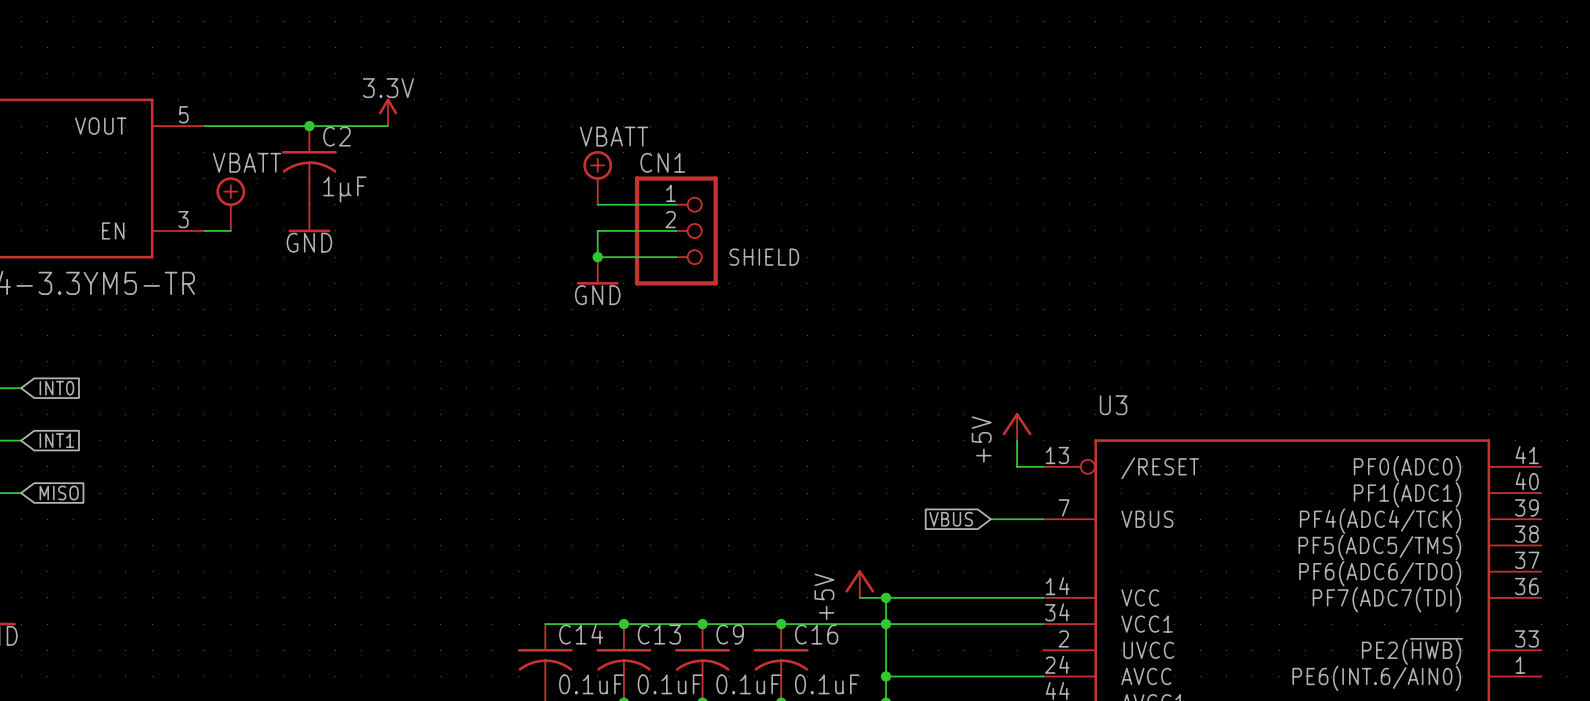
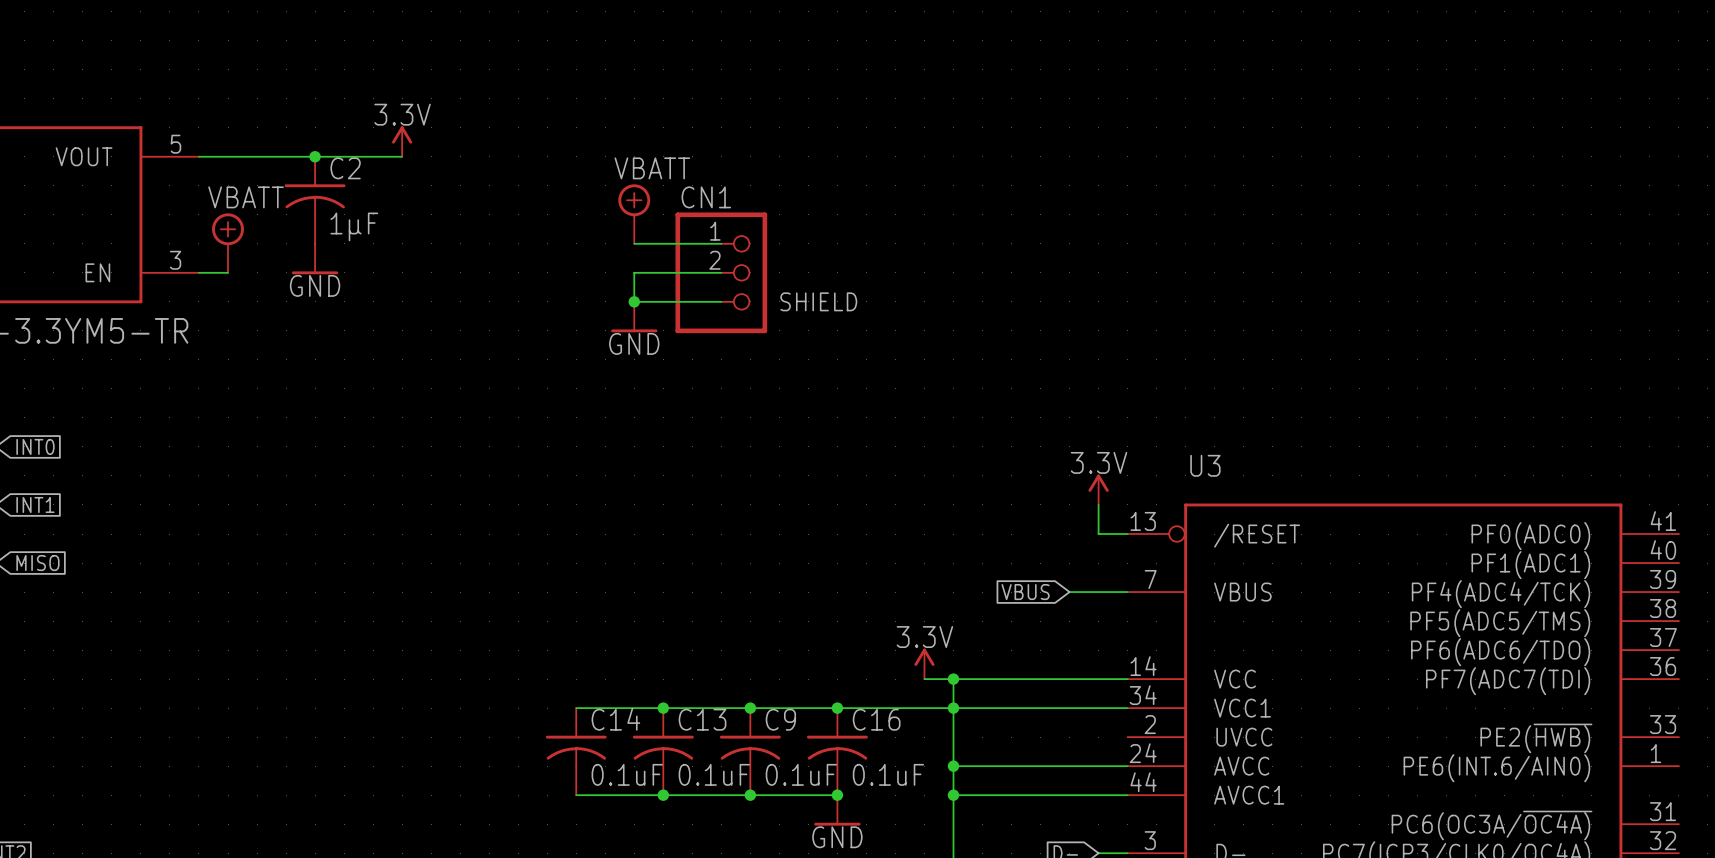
power symbol: +5V (1017, 426) -> 3.3V (1098, 489)
power symbol: +5V (859, 584) -> 3.3V (924, 663)

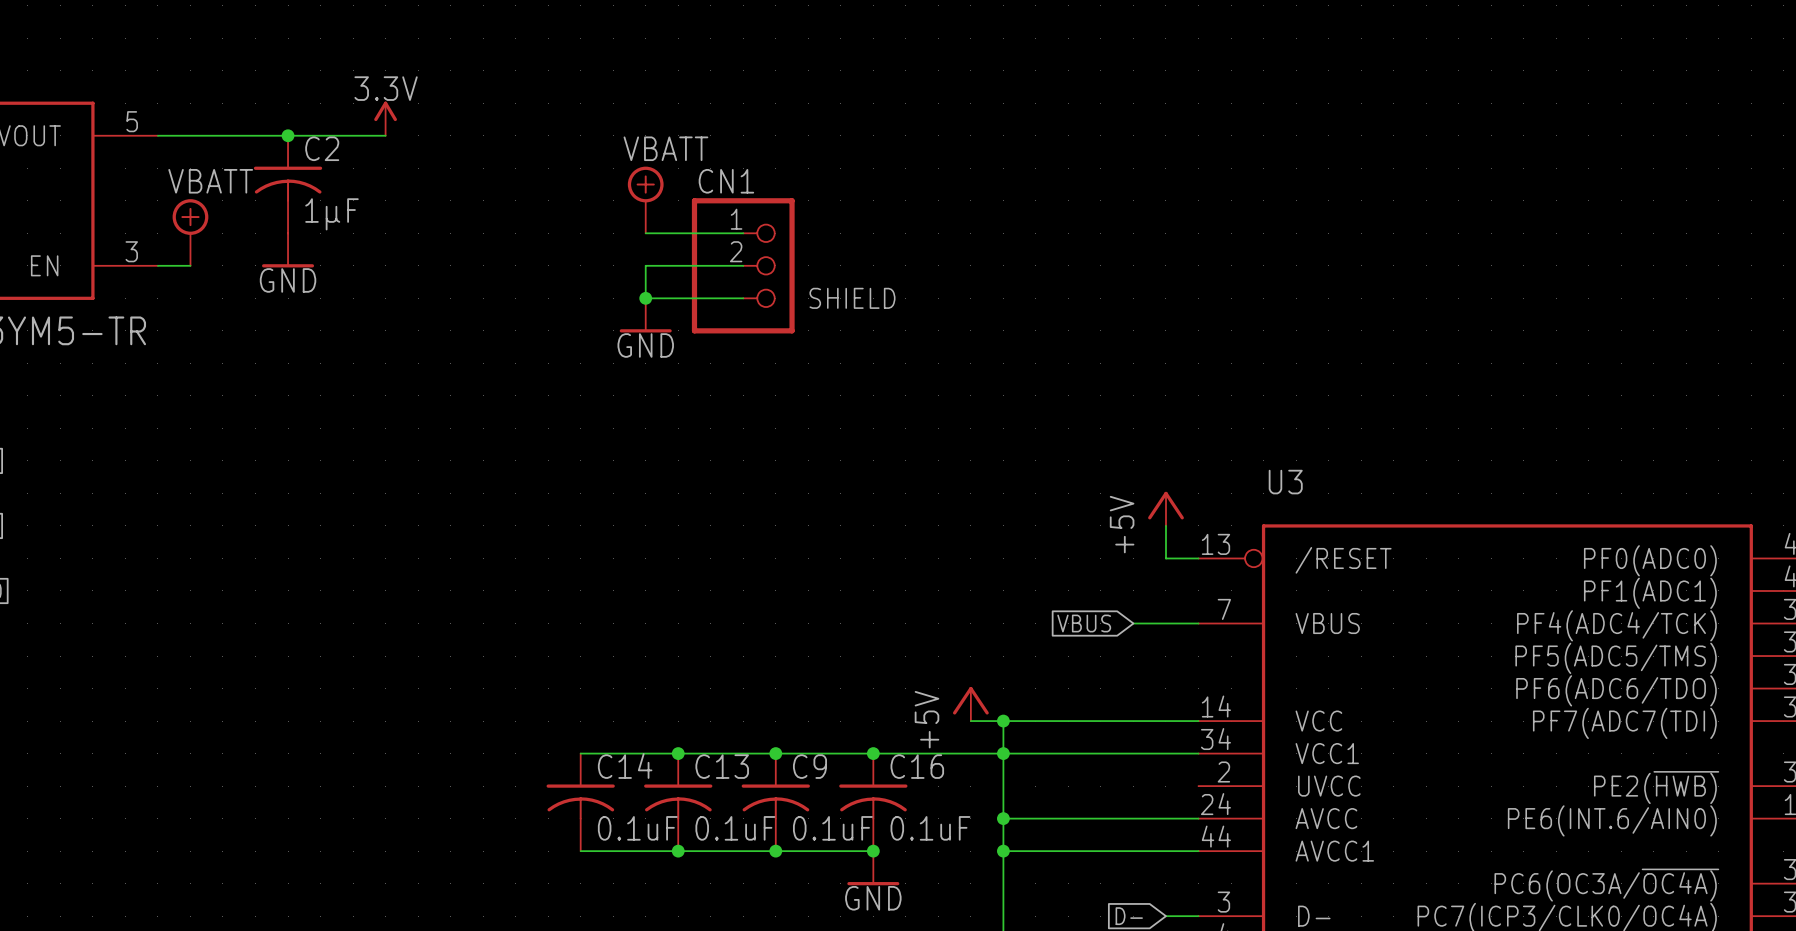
power symbol: 3.3V (1098, 489) -> +5V (1165, 508)
power symbol: 3.3V (924, 663) -> +5V (970, 703)

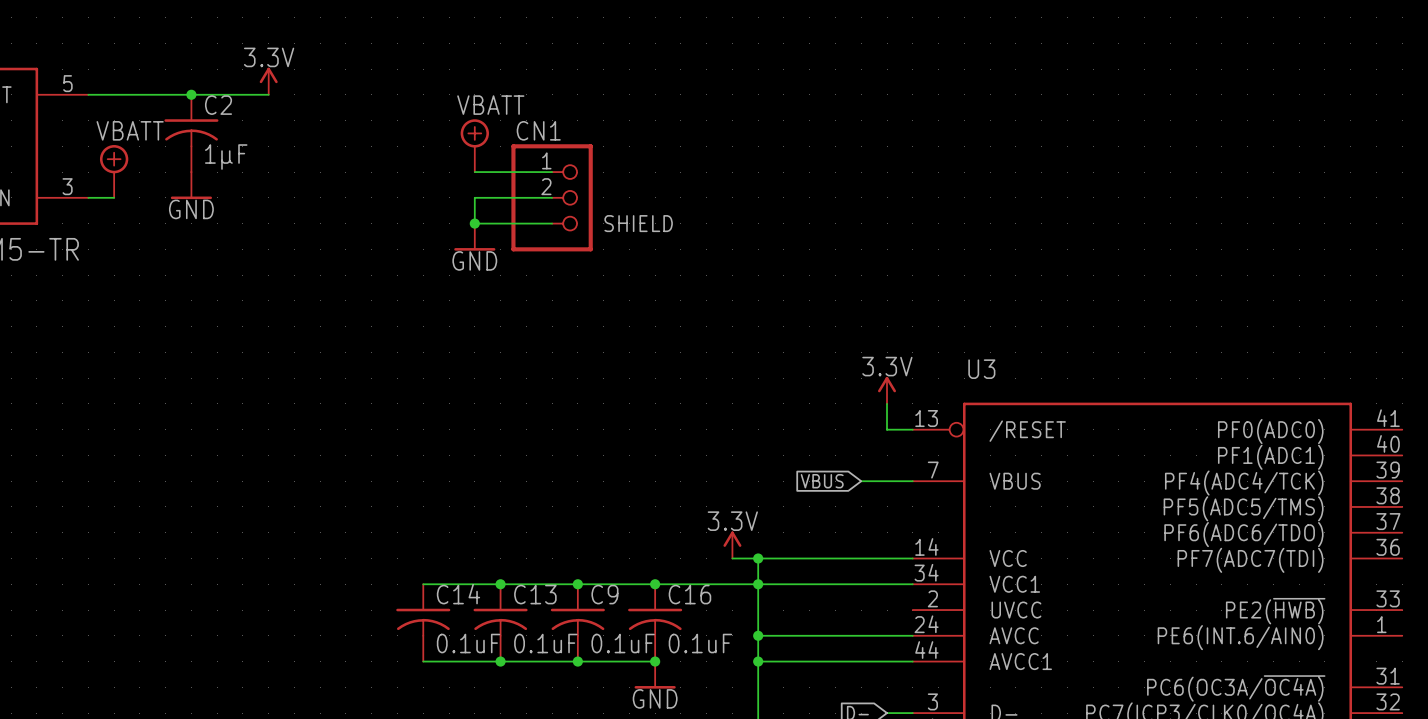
power symbol: +5V (1165, 508) -> 3.3V (887, 390)
power symbol: +5V (970, 703) -> 3.3V (732, 544)

